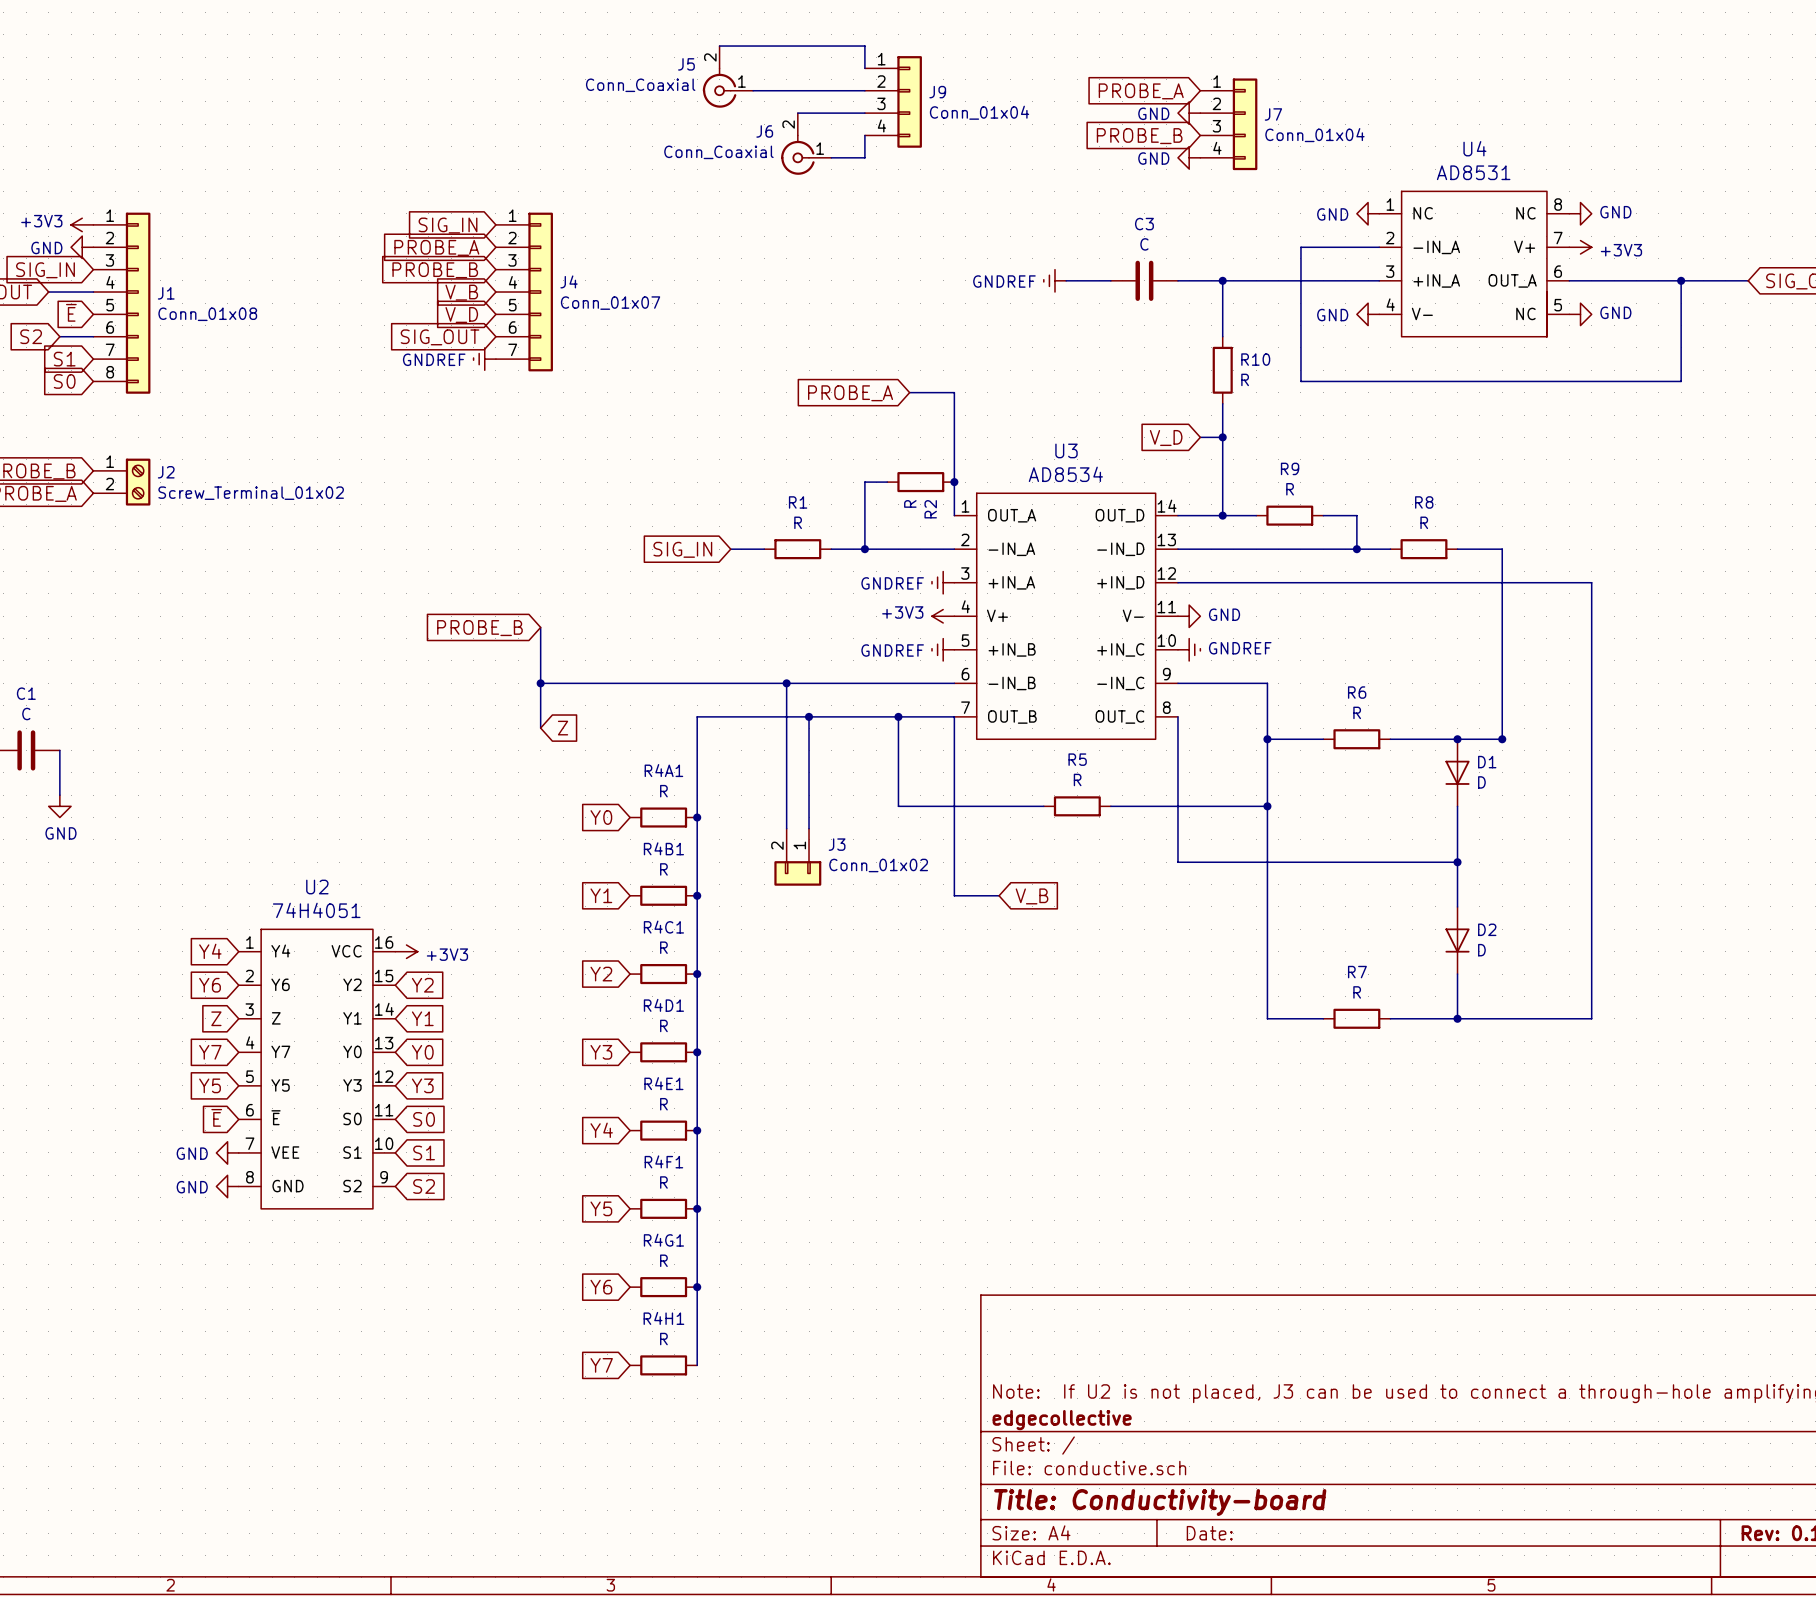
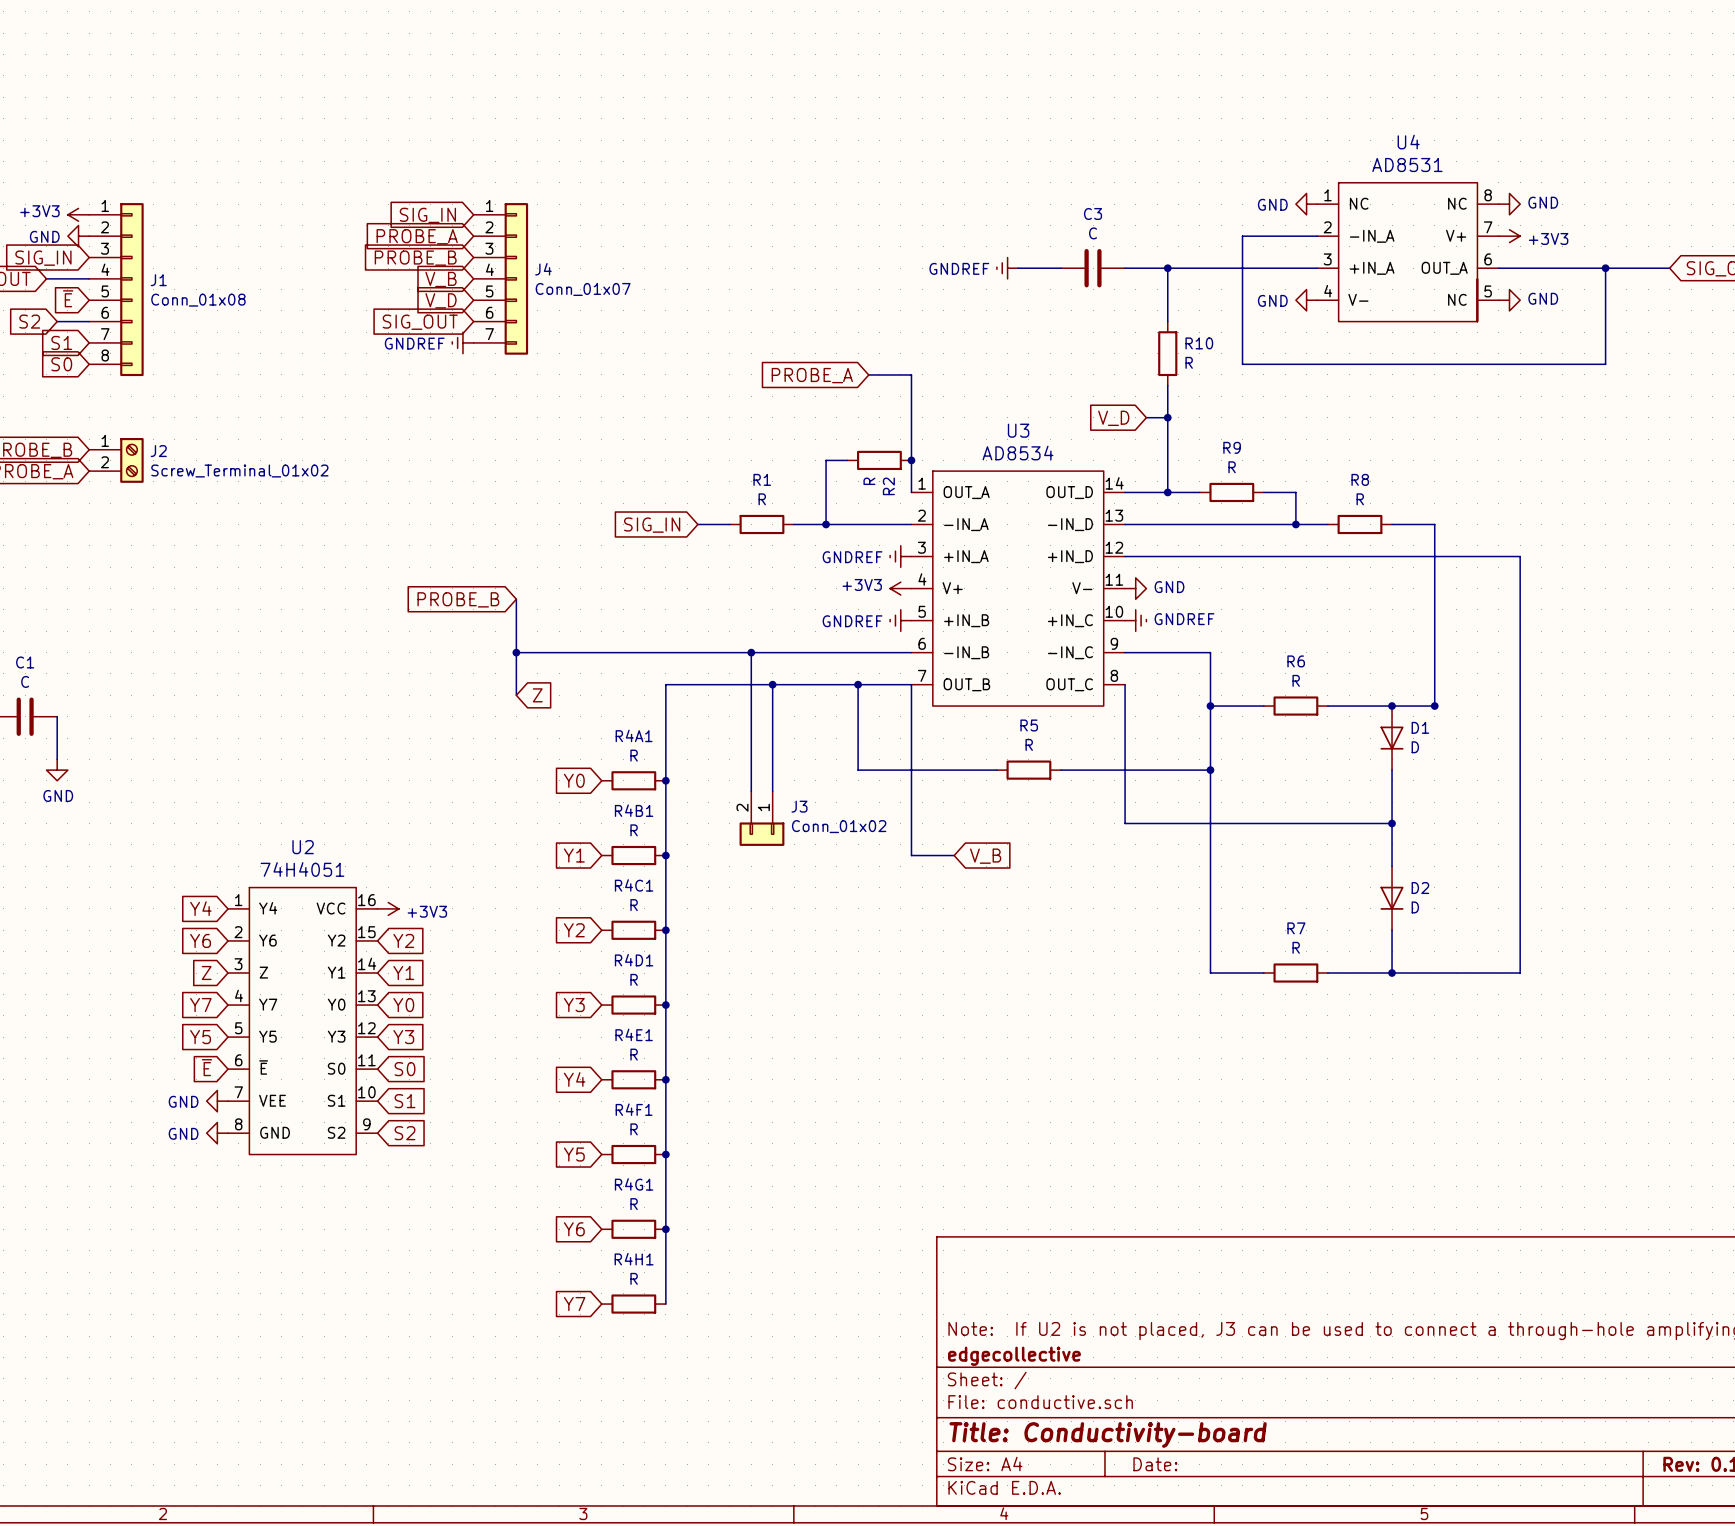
wire: (719, 46) (864, 46) (864, 68) -> none
J5: Conn_Coaxial (727, 76) -> none
wire: (753, 90) (864, 90) -> none
global label: PROBE_A (1141, 91) -> none
J9: Conn_01x04 (893, 101) -> none
wire: (797, 113) (864, 113) -> none
power symbol: GND (1189, 113) -> none
J7: Conn_01x04 (1228, 124) -> none
wire: (864, 135) (864, 157) (831, 157) -> none
global label: PROBE_B (1139, 136) -> none
J6: Conn_Coaxial (806, 143) -> none
power symbol: GND (1189, 157) -> none

